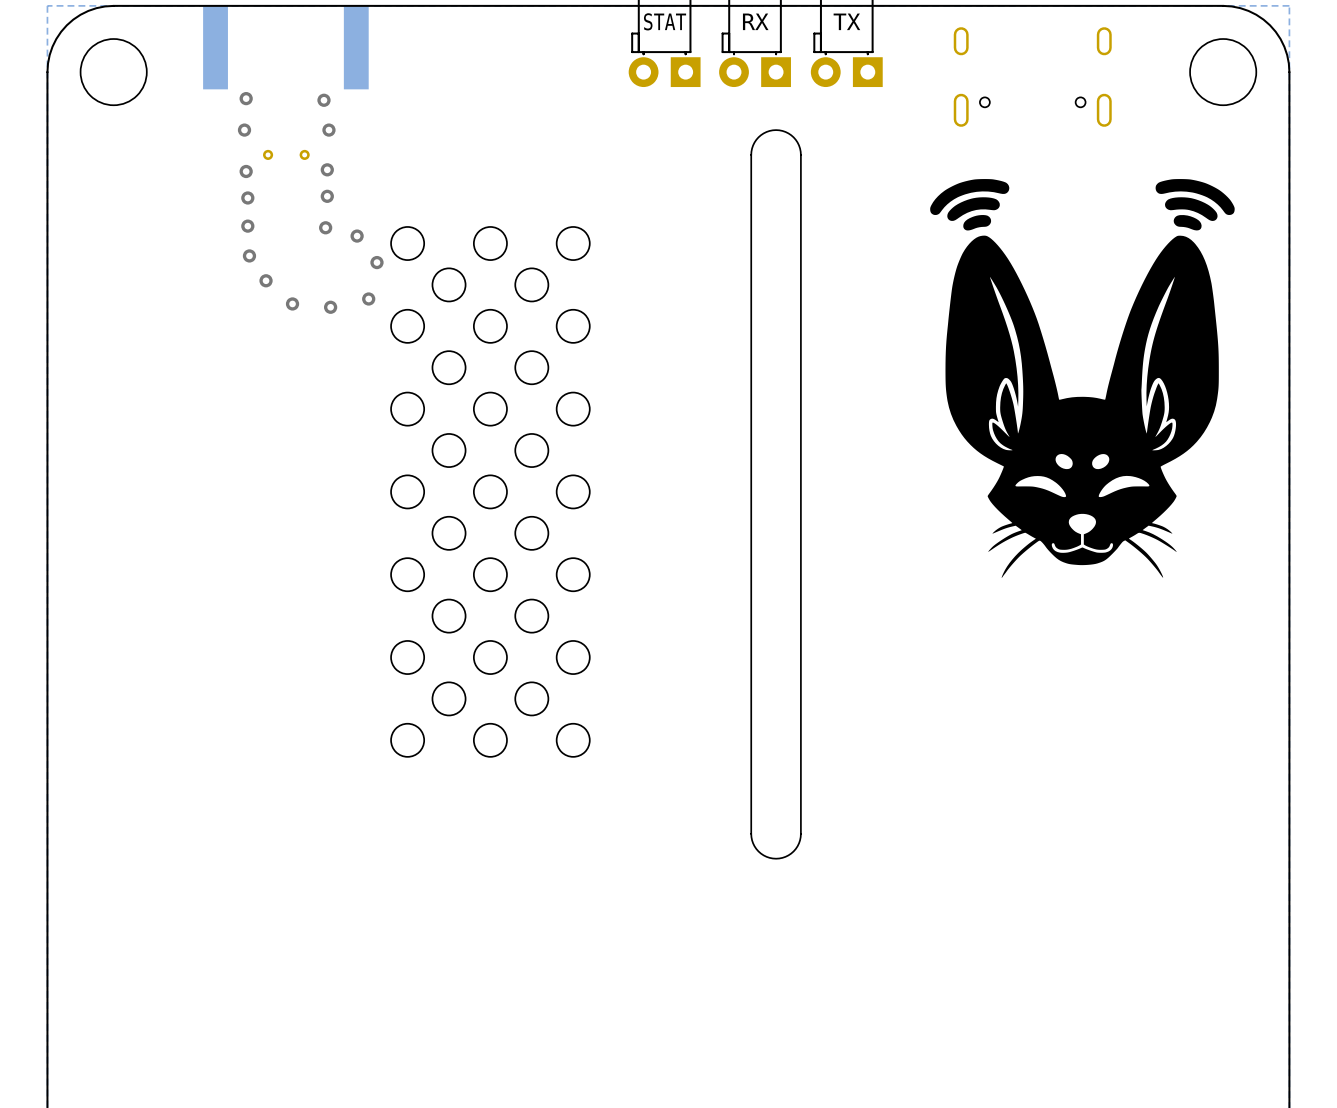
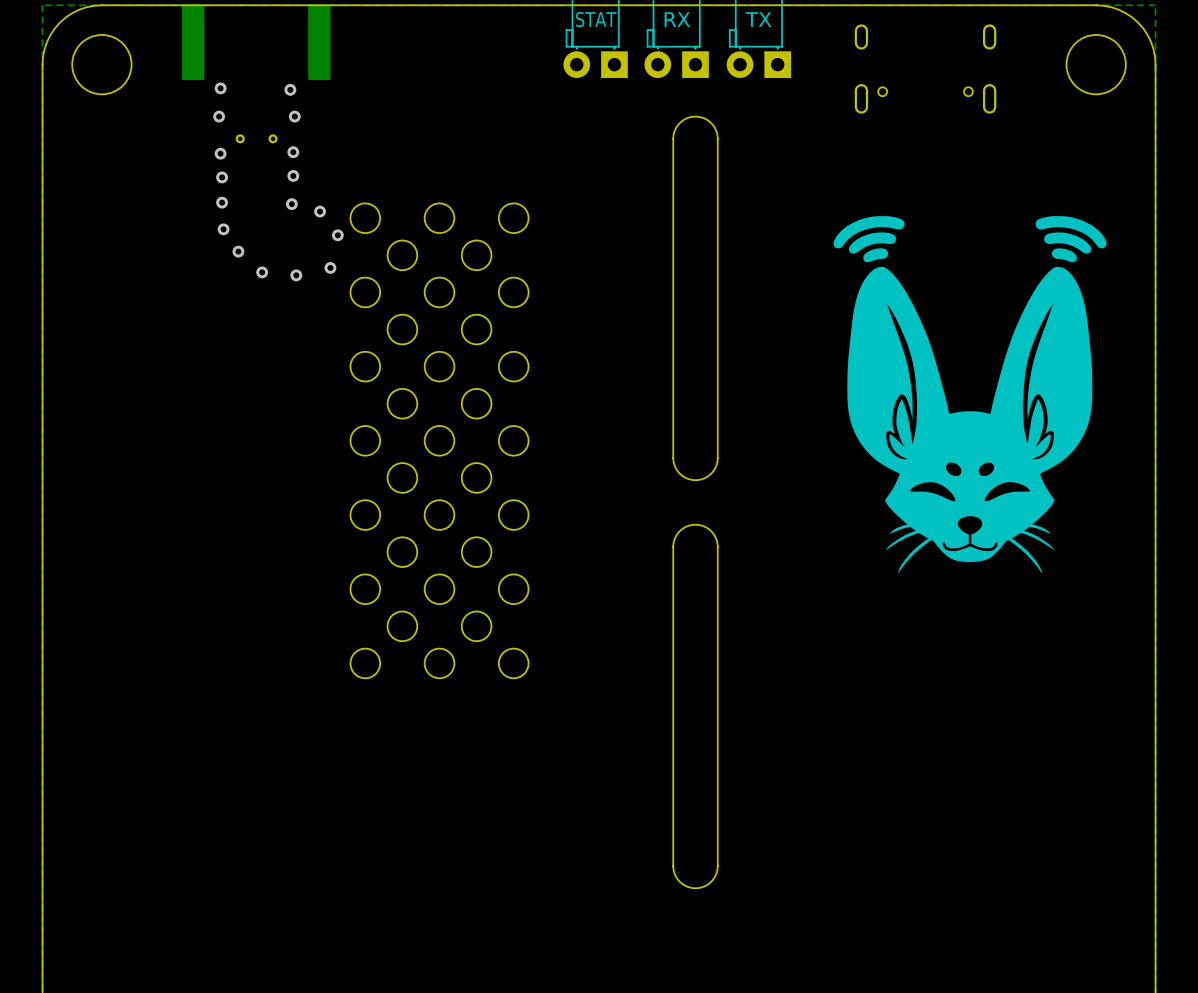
drawing position: (1082, 378) -> (970, 394)
board edge: (751, 510) (751, 610) -> (717, 546) (716, 538) (711, 531) (704, 526) (695, 524) (686, 526) (679, 531) (674, 538) (673, 546)
board edge: (800, 510) (800, 610) -> (717, 457) (716, 466) (711, 473) (704, 478) (695, 480) (686, 478) (679, 473) (674, 466) (673, 457)
board edge: (800, 833) (799, 843) (793, 851) (785, 856) (776, 858) (766, 856) (758, 851) (753, 843) (751, 833) -> (717, 747) (717, 868) (714, 877) (709, 883) (695, 888) (681, 883) (676, 877) (673, 868) (673, 747)

